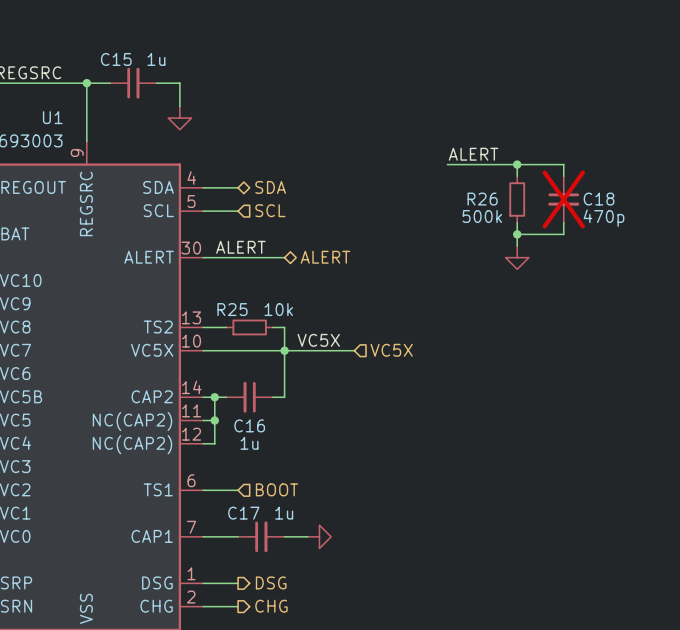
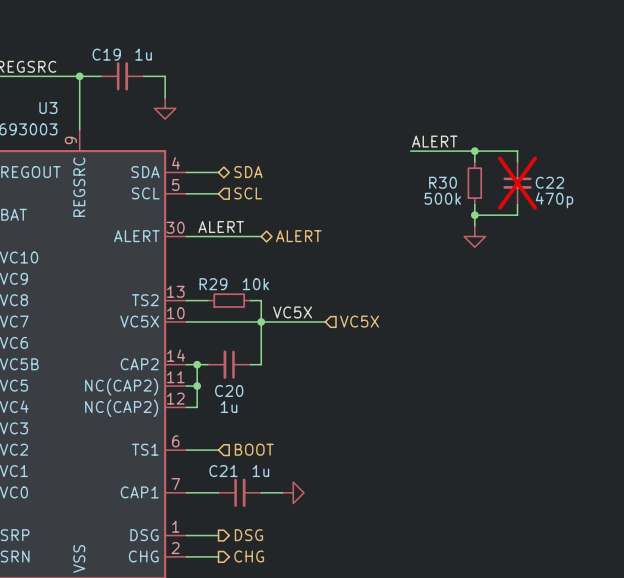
C15 name: C15 (116, 59) -> C19 (106, 54)
U1 name: U1 (52, 117) -> U3 (48, 107)
R26 name: R26 (482, 199) -> R30 (443, 182)
C18 name: C18 (599, 199) -> C22 (549, 182)
R25 name: R25 (232, 309) -> R29 (213, 284)
C16 name: C16 (249, 425) -> C20 (229, 390)
C17 name: C17 (243, 513) -> C21 (223, 471)

